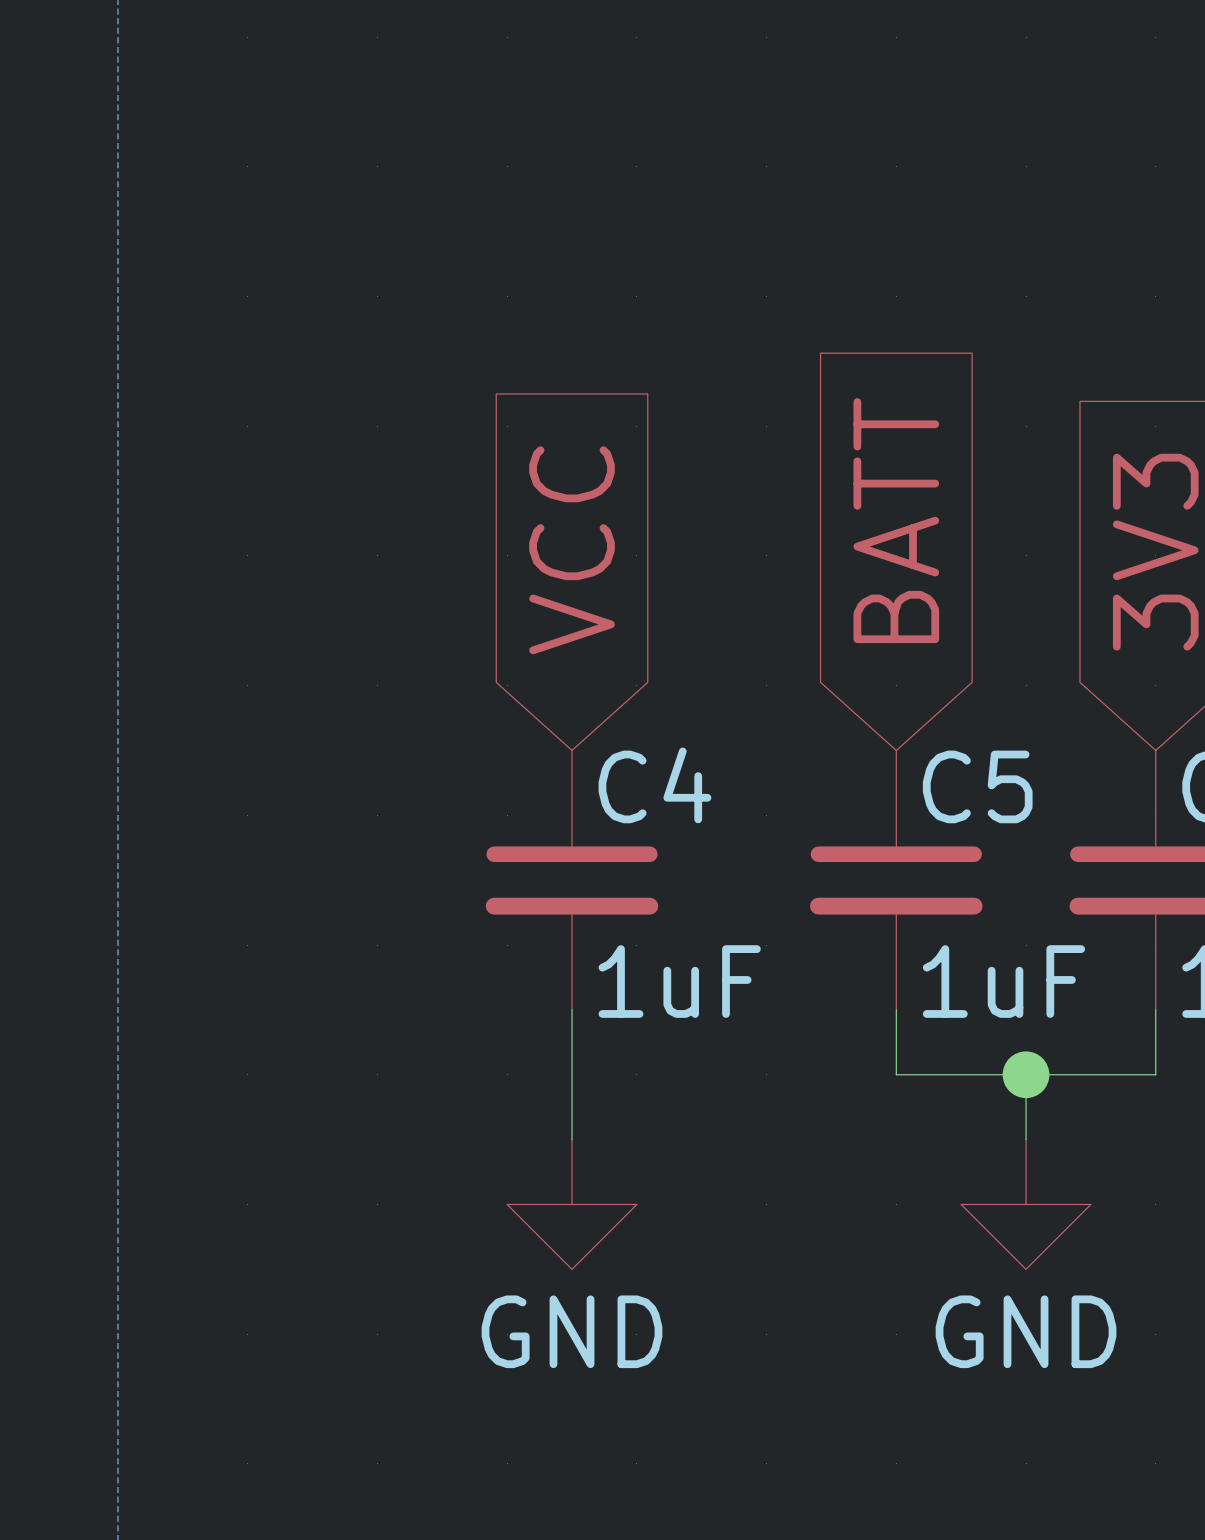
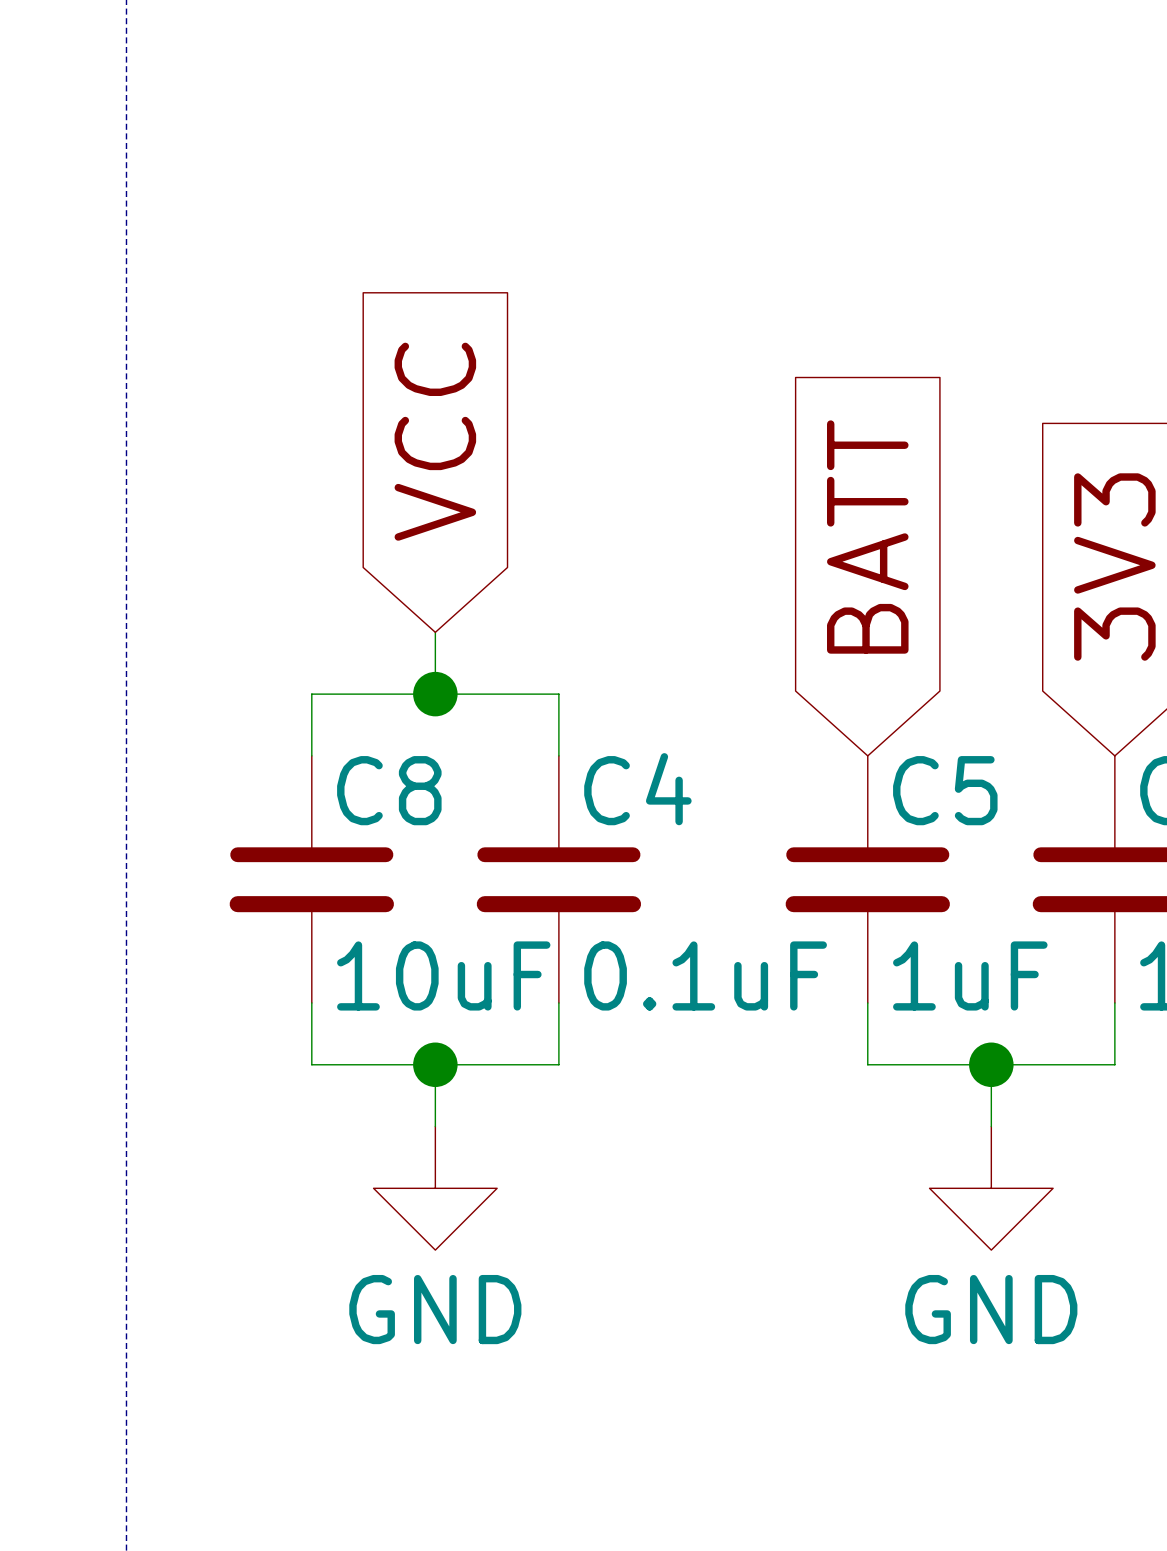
global label position: VCC (572, 550) -> VCC (435, 441)
wire: none -> (435, 632) (435, 694)
junction: none -> (435, 694)
wire: none -> (311, 755) (311, 694) (558, 694) (558, 755)
C8: none -> 10uF (311, 879)
C4 value: 1uF (679, 981) -> 0.1uF (705, 975)
wire: none -> (435, 1064) (435, 1126)
junction: none -> (435, 1064)
wire: (572, 1074) (572, 1139) -> (558, 1064) (311, 1064) (311, 1002)
power symbol position: GND (572, 1204) -> GND (435, 1188)

